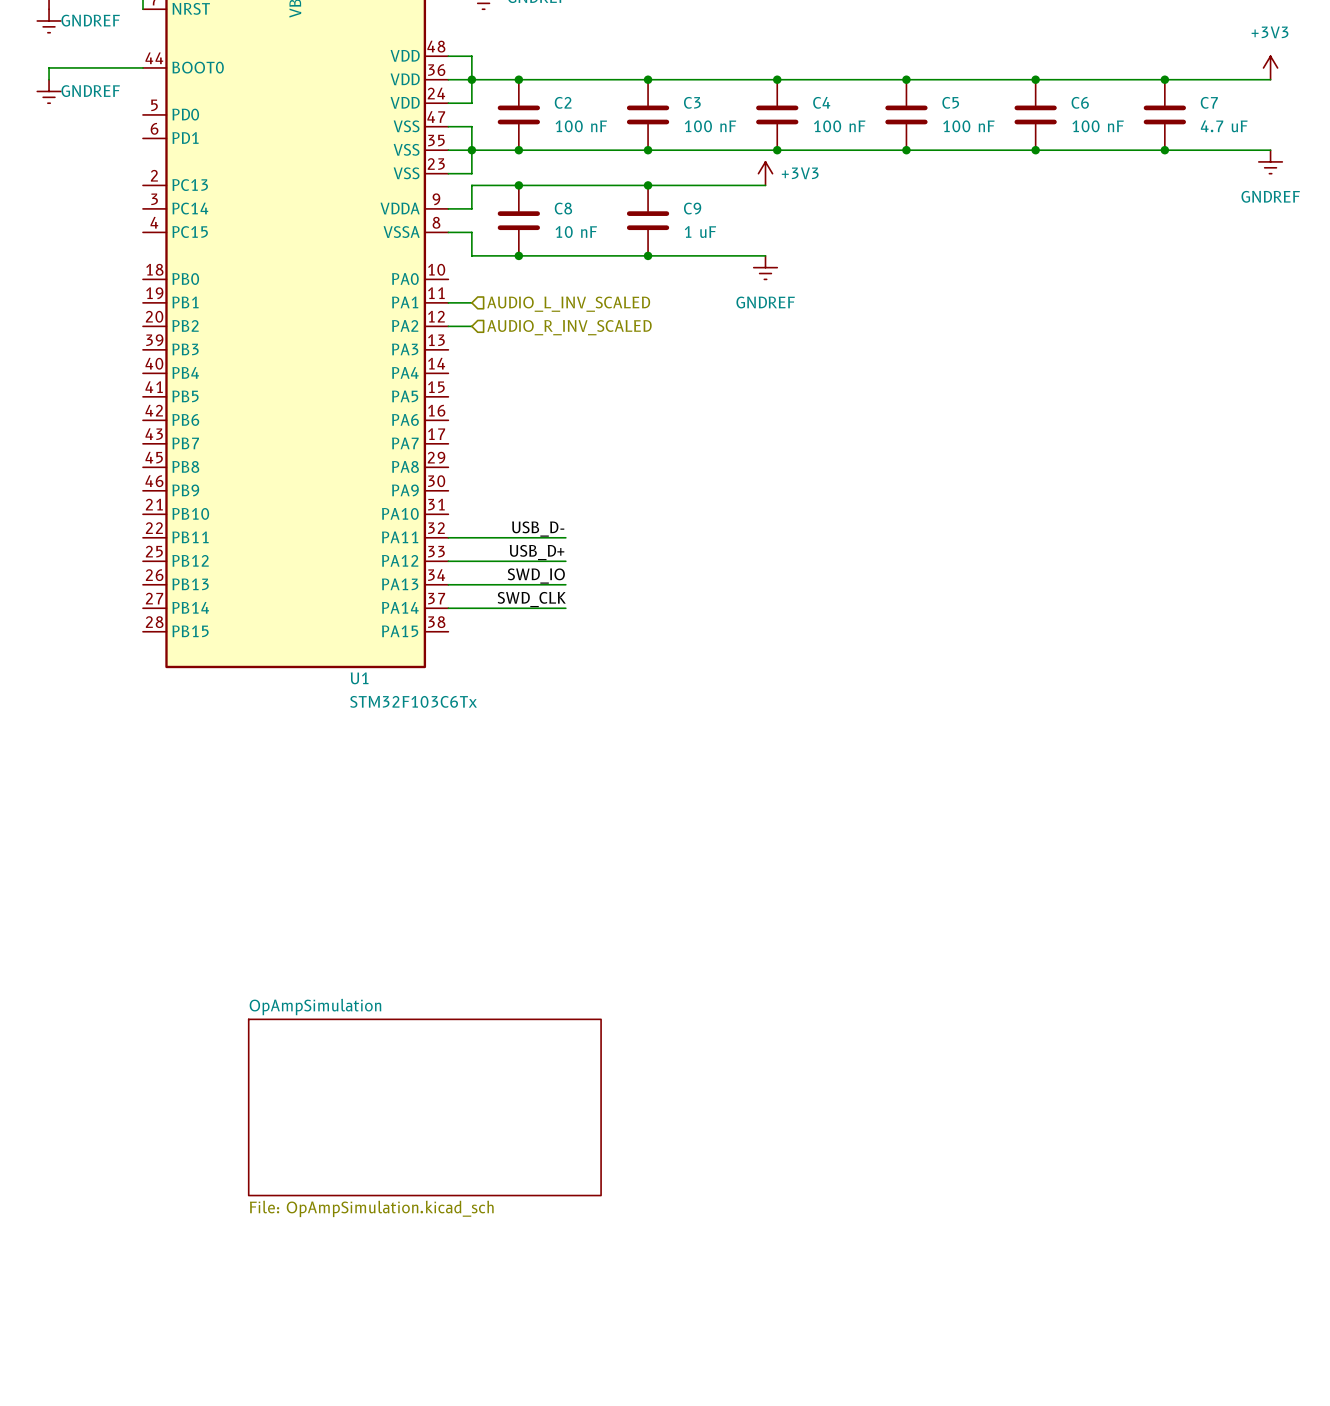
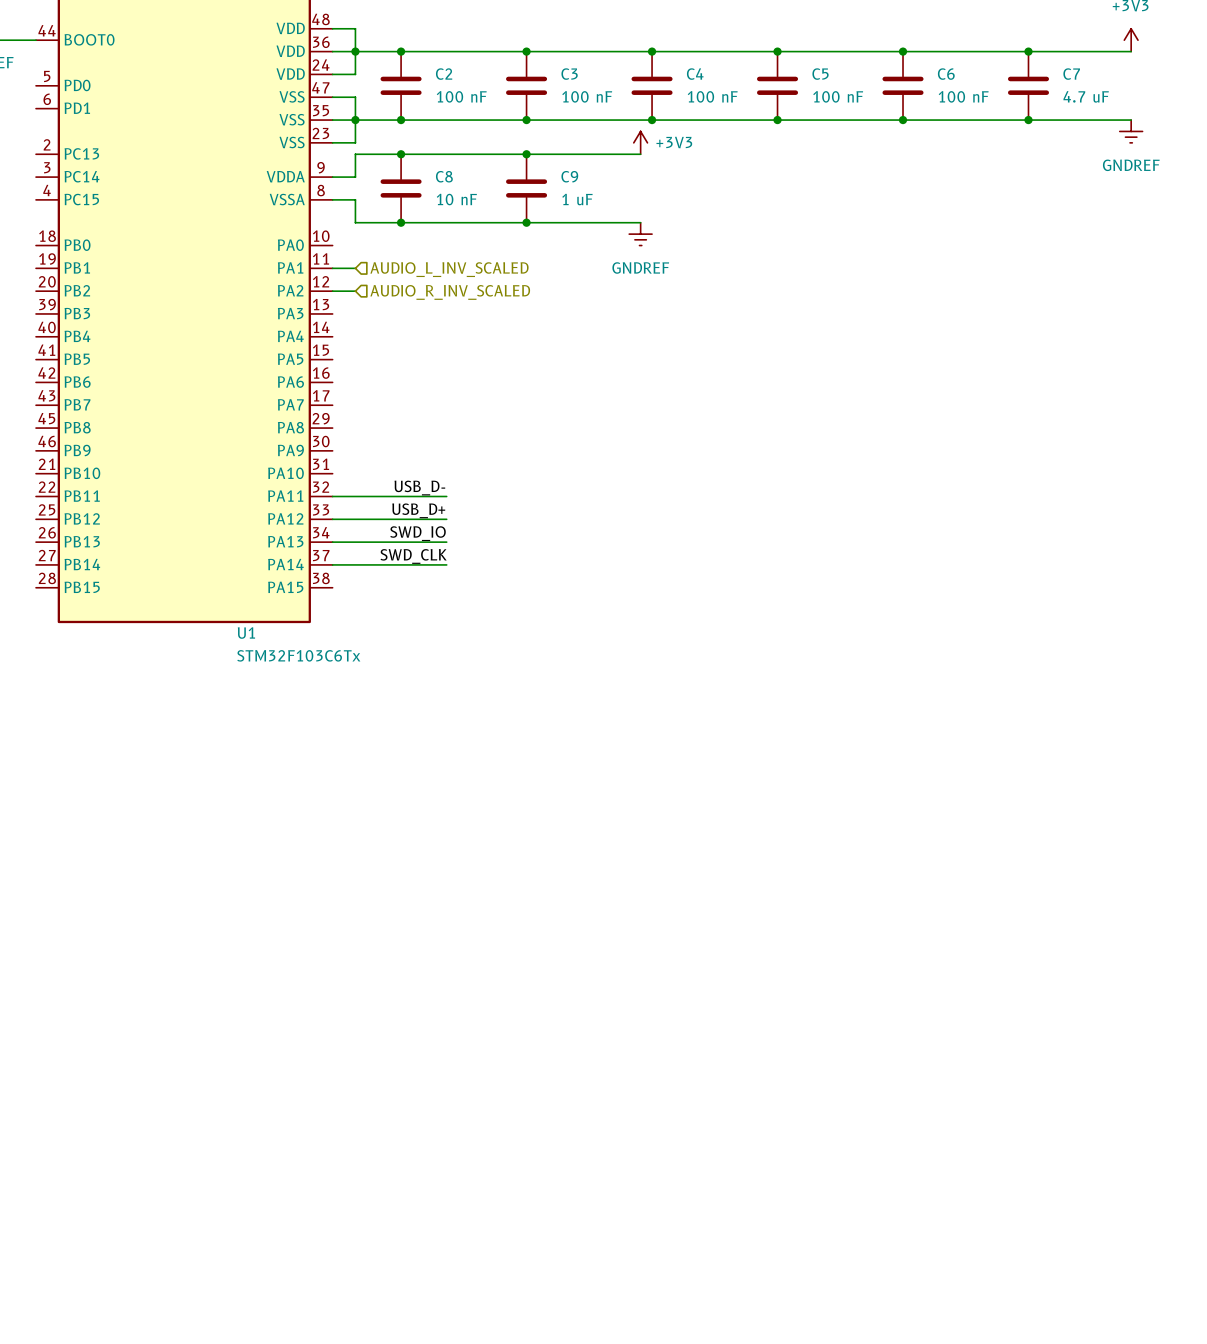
sheet OpAmpSimulation: File: OpAmpSimulation.kicad_sch (424, 1107) -> none

